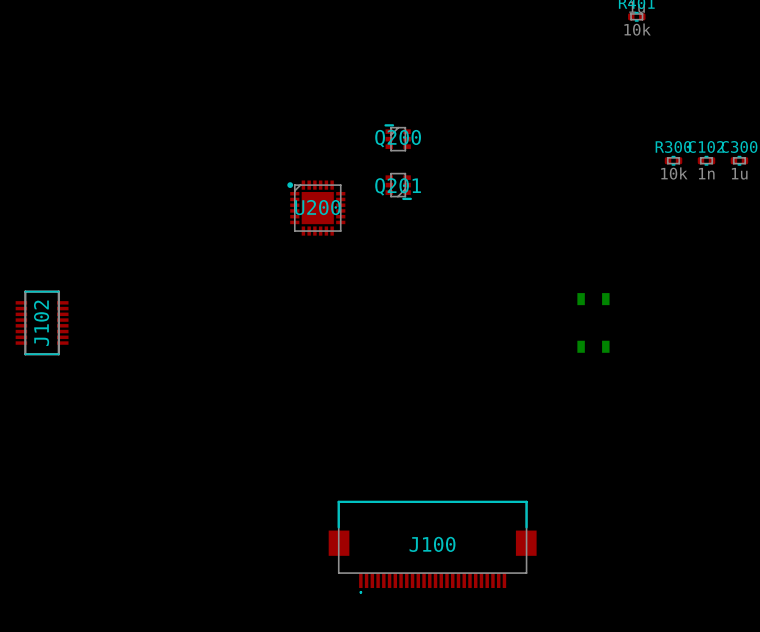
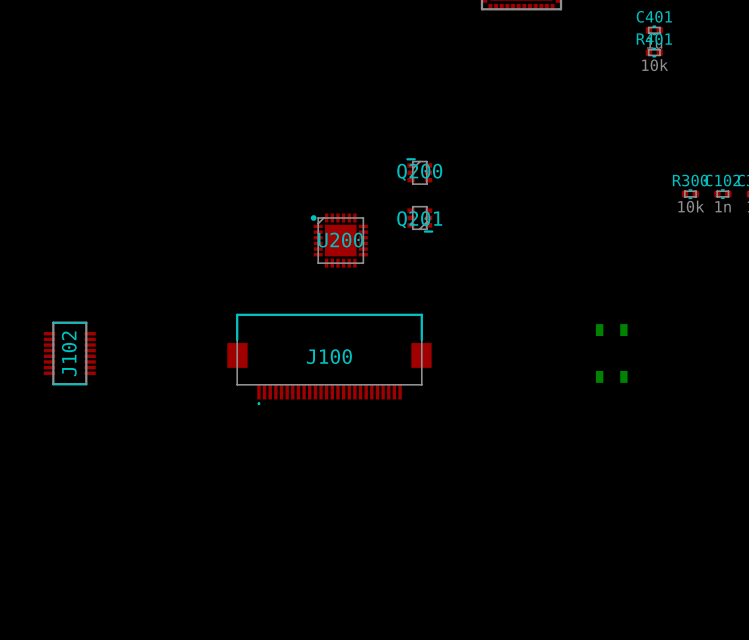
J100 position: (432, 547) -> (329, 359)

